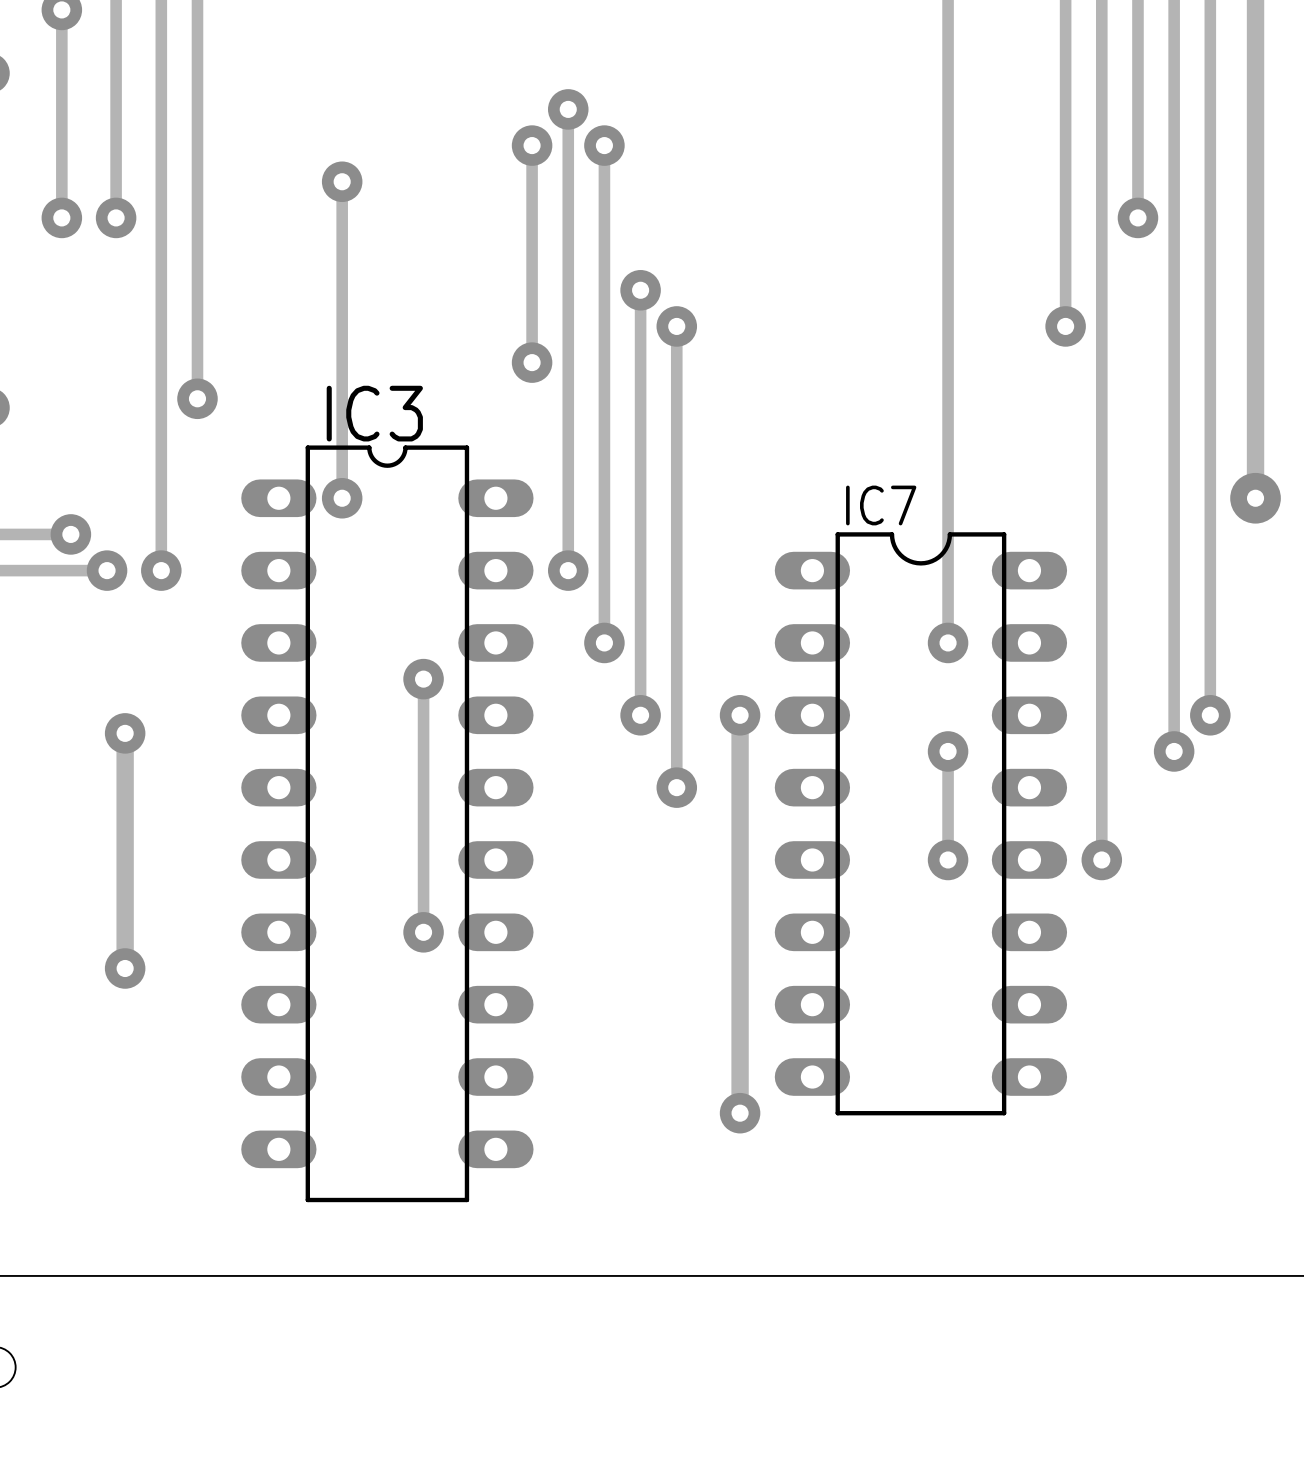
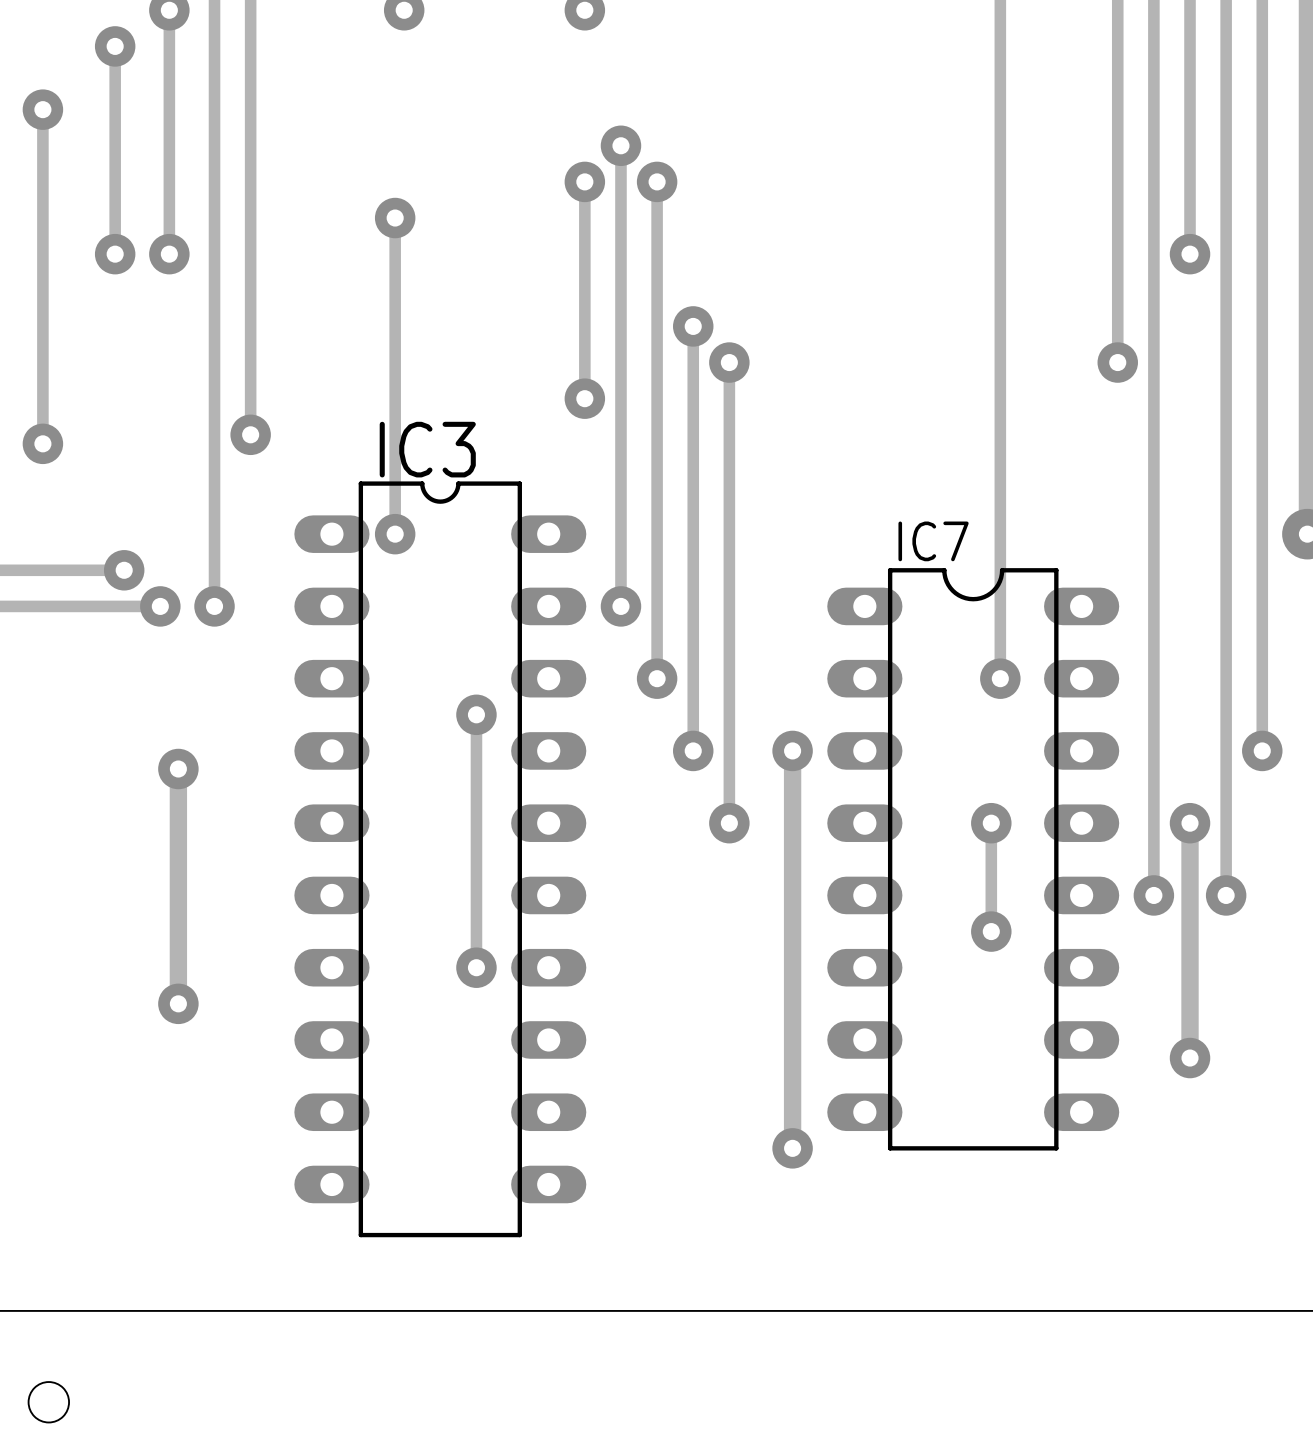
track: (948, 751) (948, 859) -> (991, 823) (991, 931)
via: (948, 751) -> none
track: none -> (1226, 787) (1226, 895)
via position: (1174, 751) -> (1190, 823)
via: none -> (991, 823)
track: none -> (1190, 823) (1190, 1058)
via: (948, 859) -> none
via: none -> (1226, 895)
via: none -> (991, 931)
via: none -> (1190, 1058)

